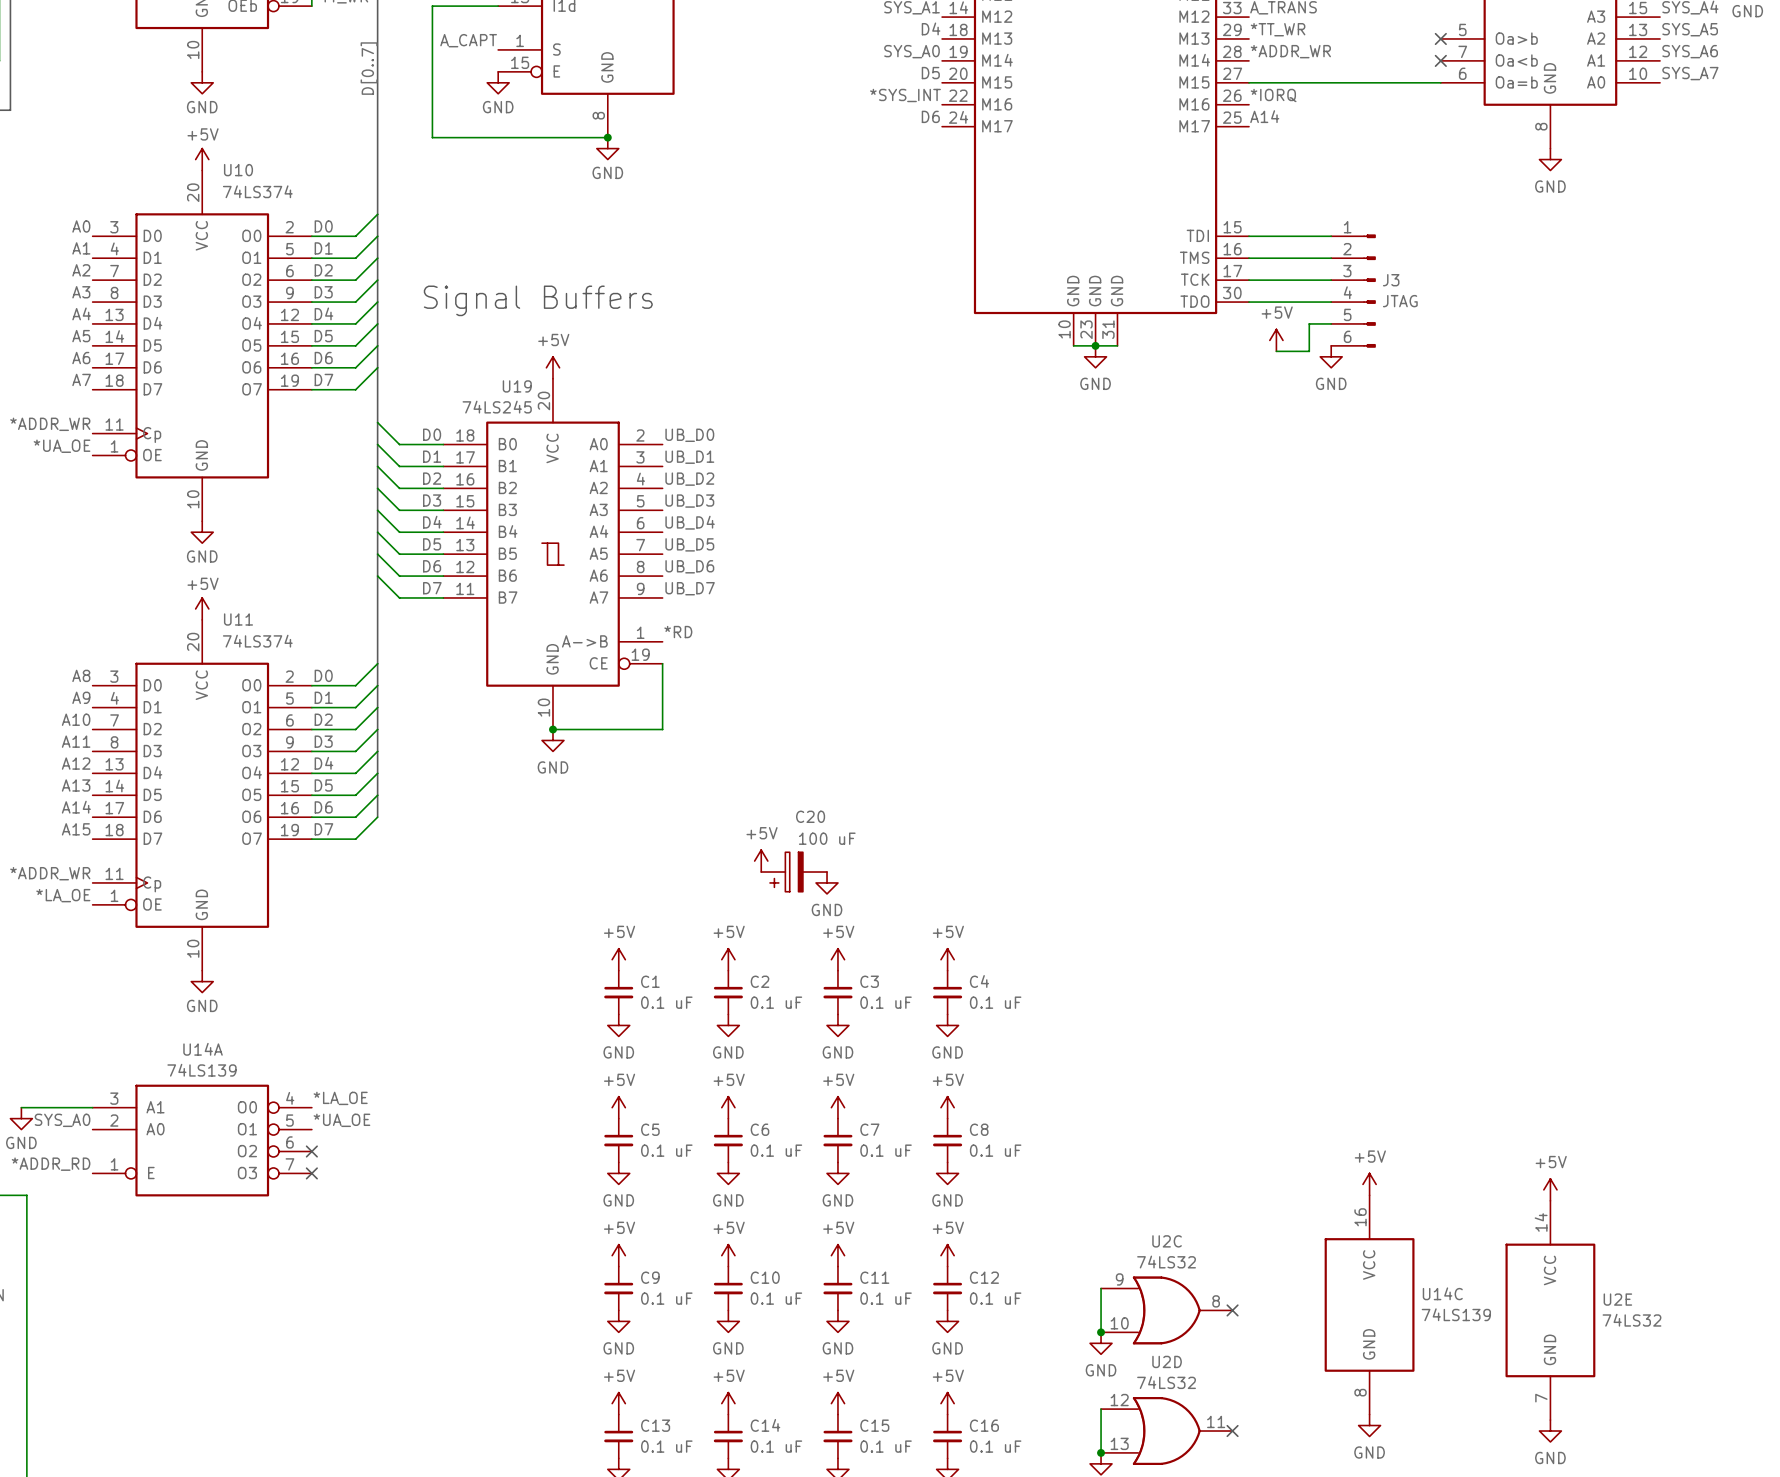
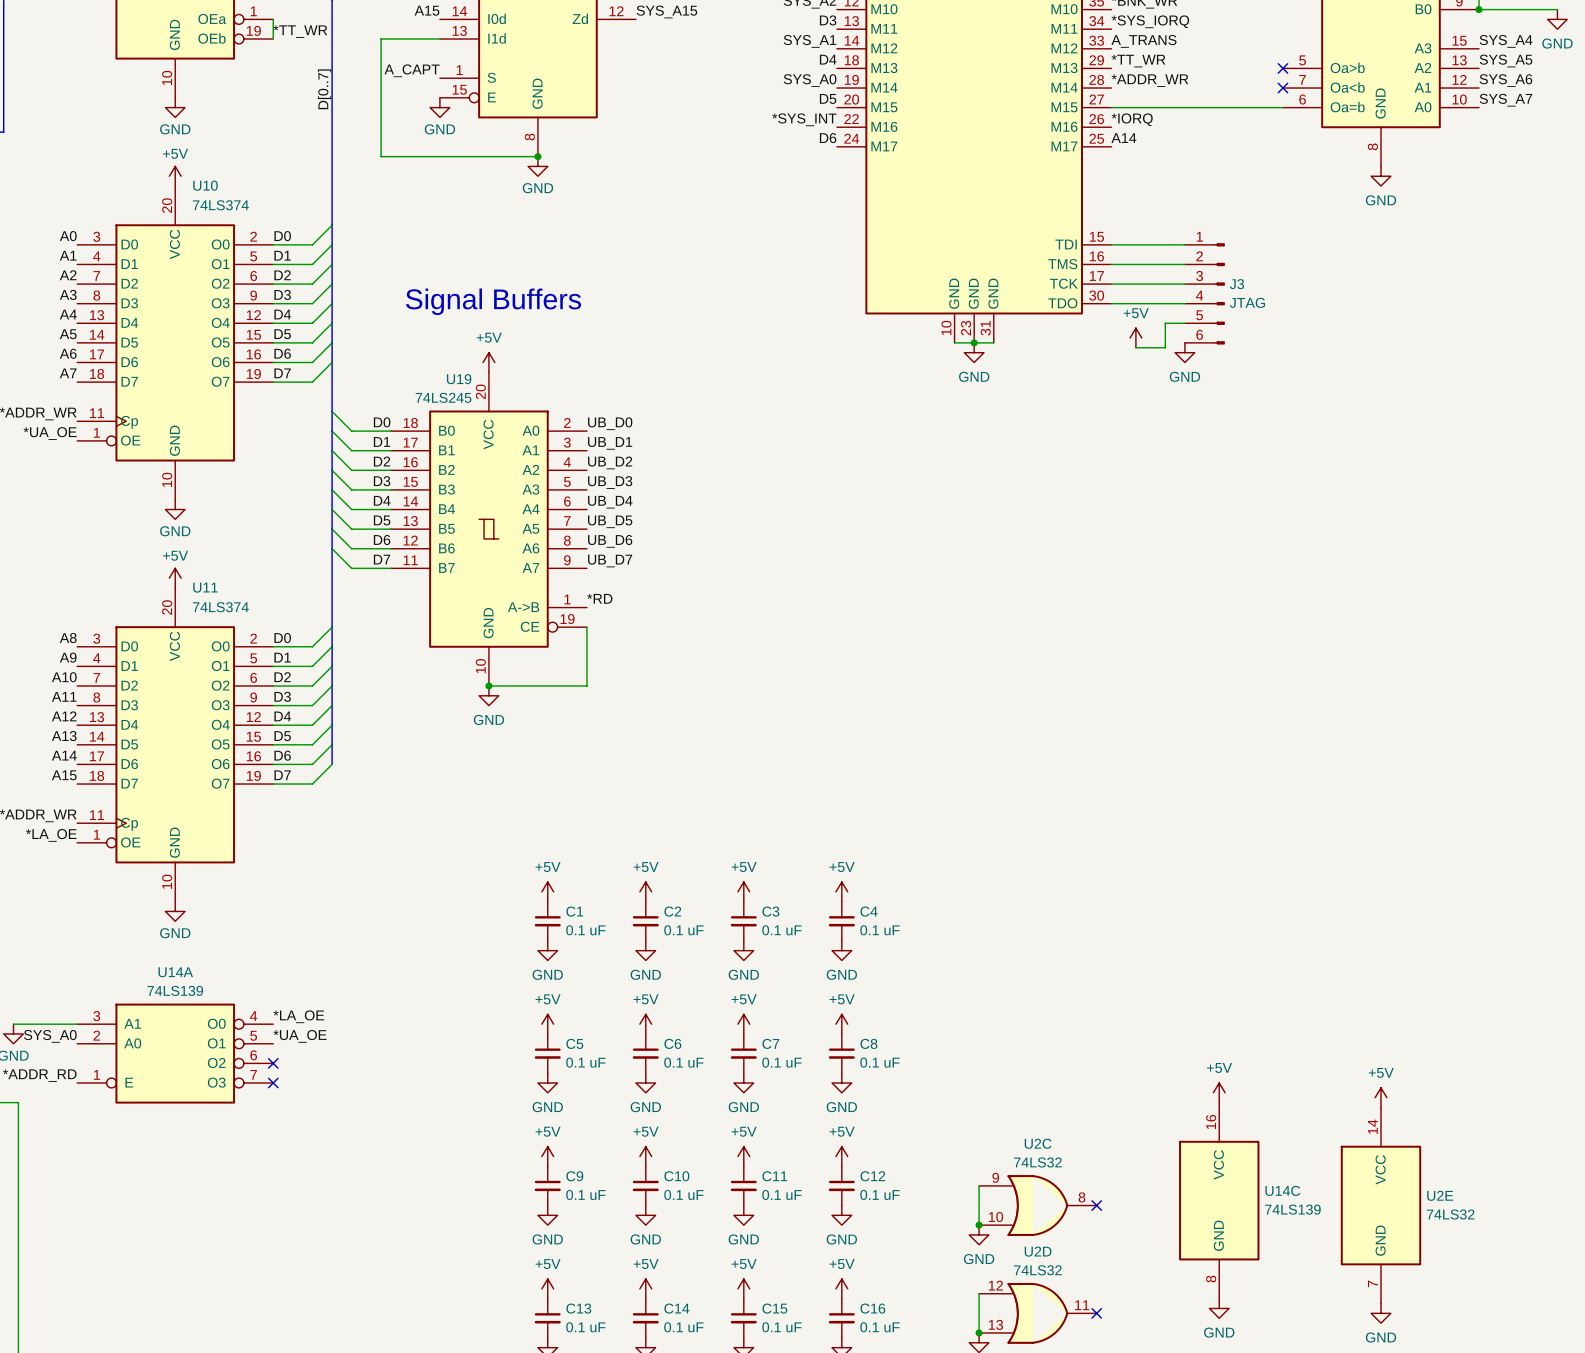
power symbol: +5V (761, 861) -> none
C20: 100 uF (794, 872) -> none
power symbol: GND (827, 882) -> none

